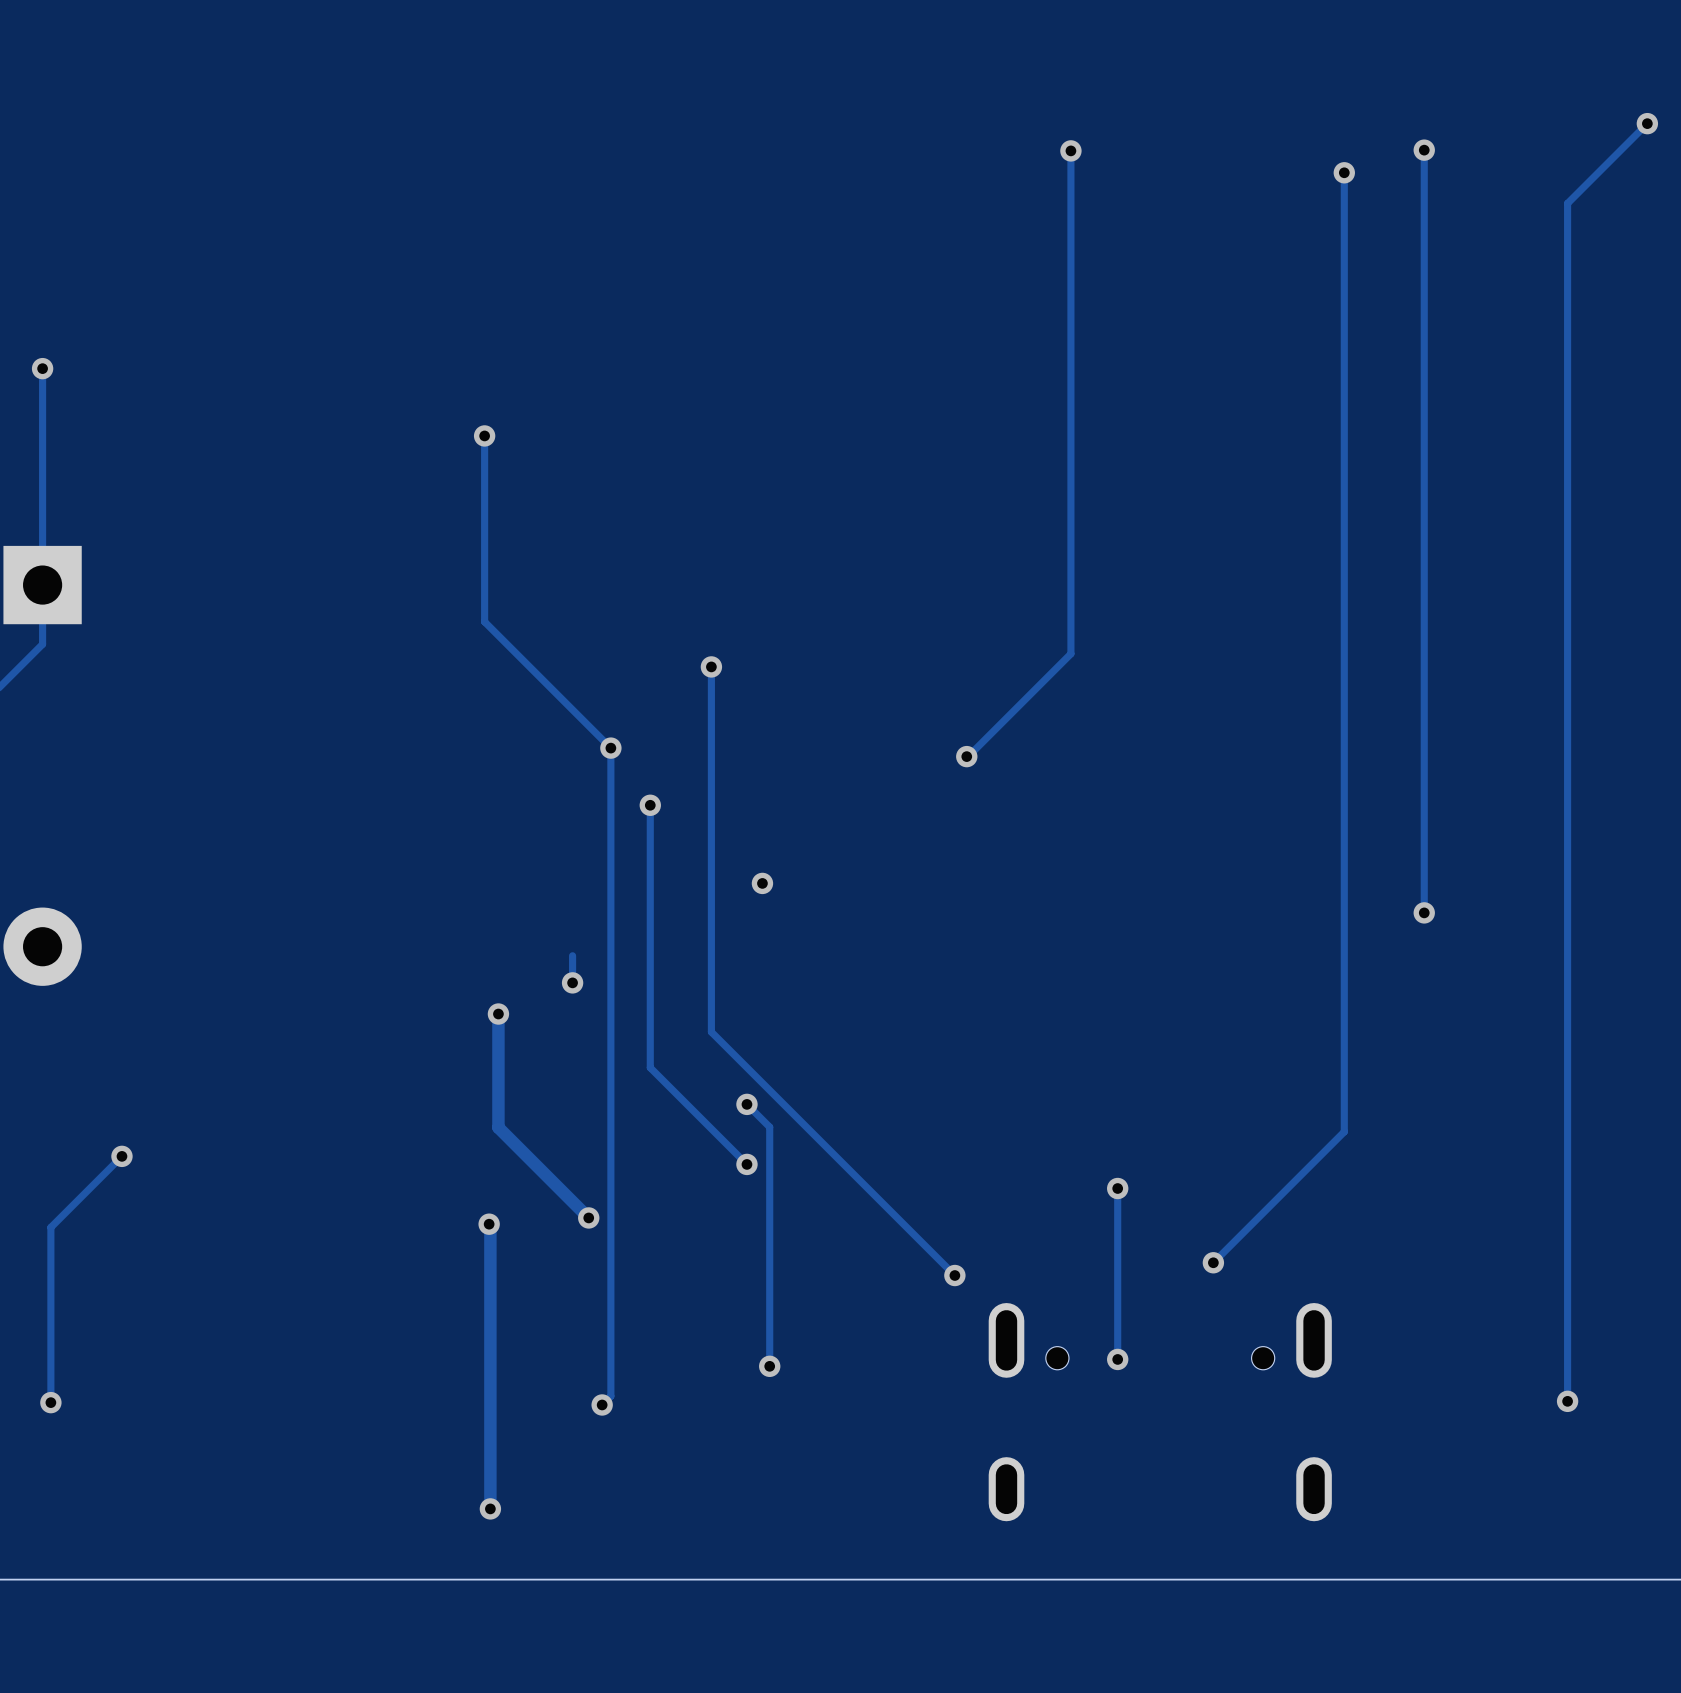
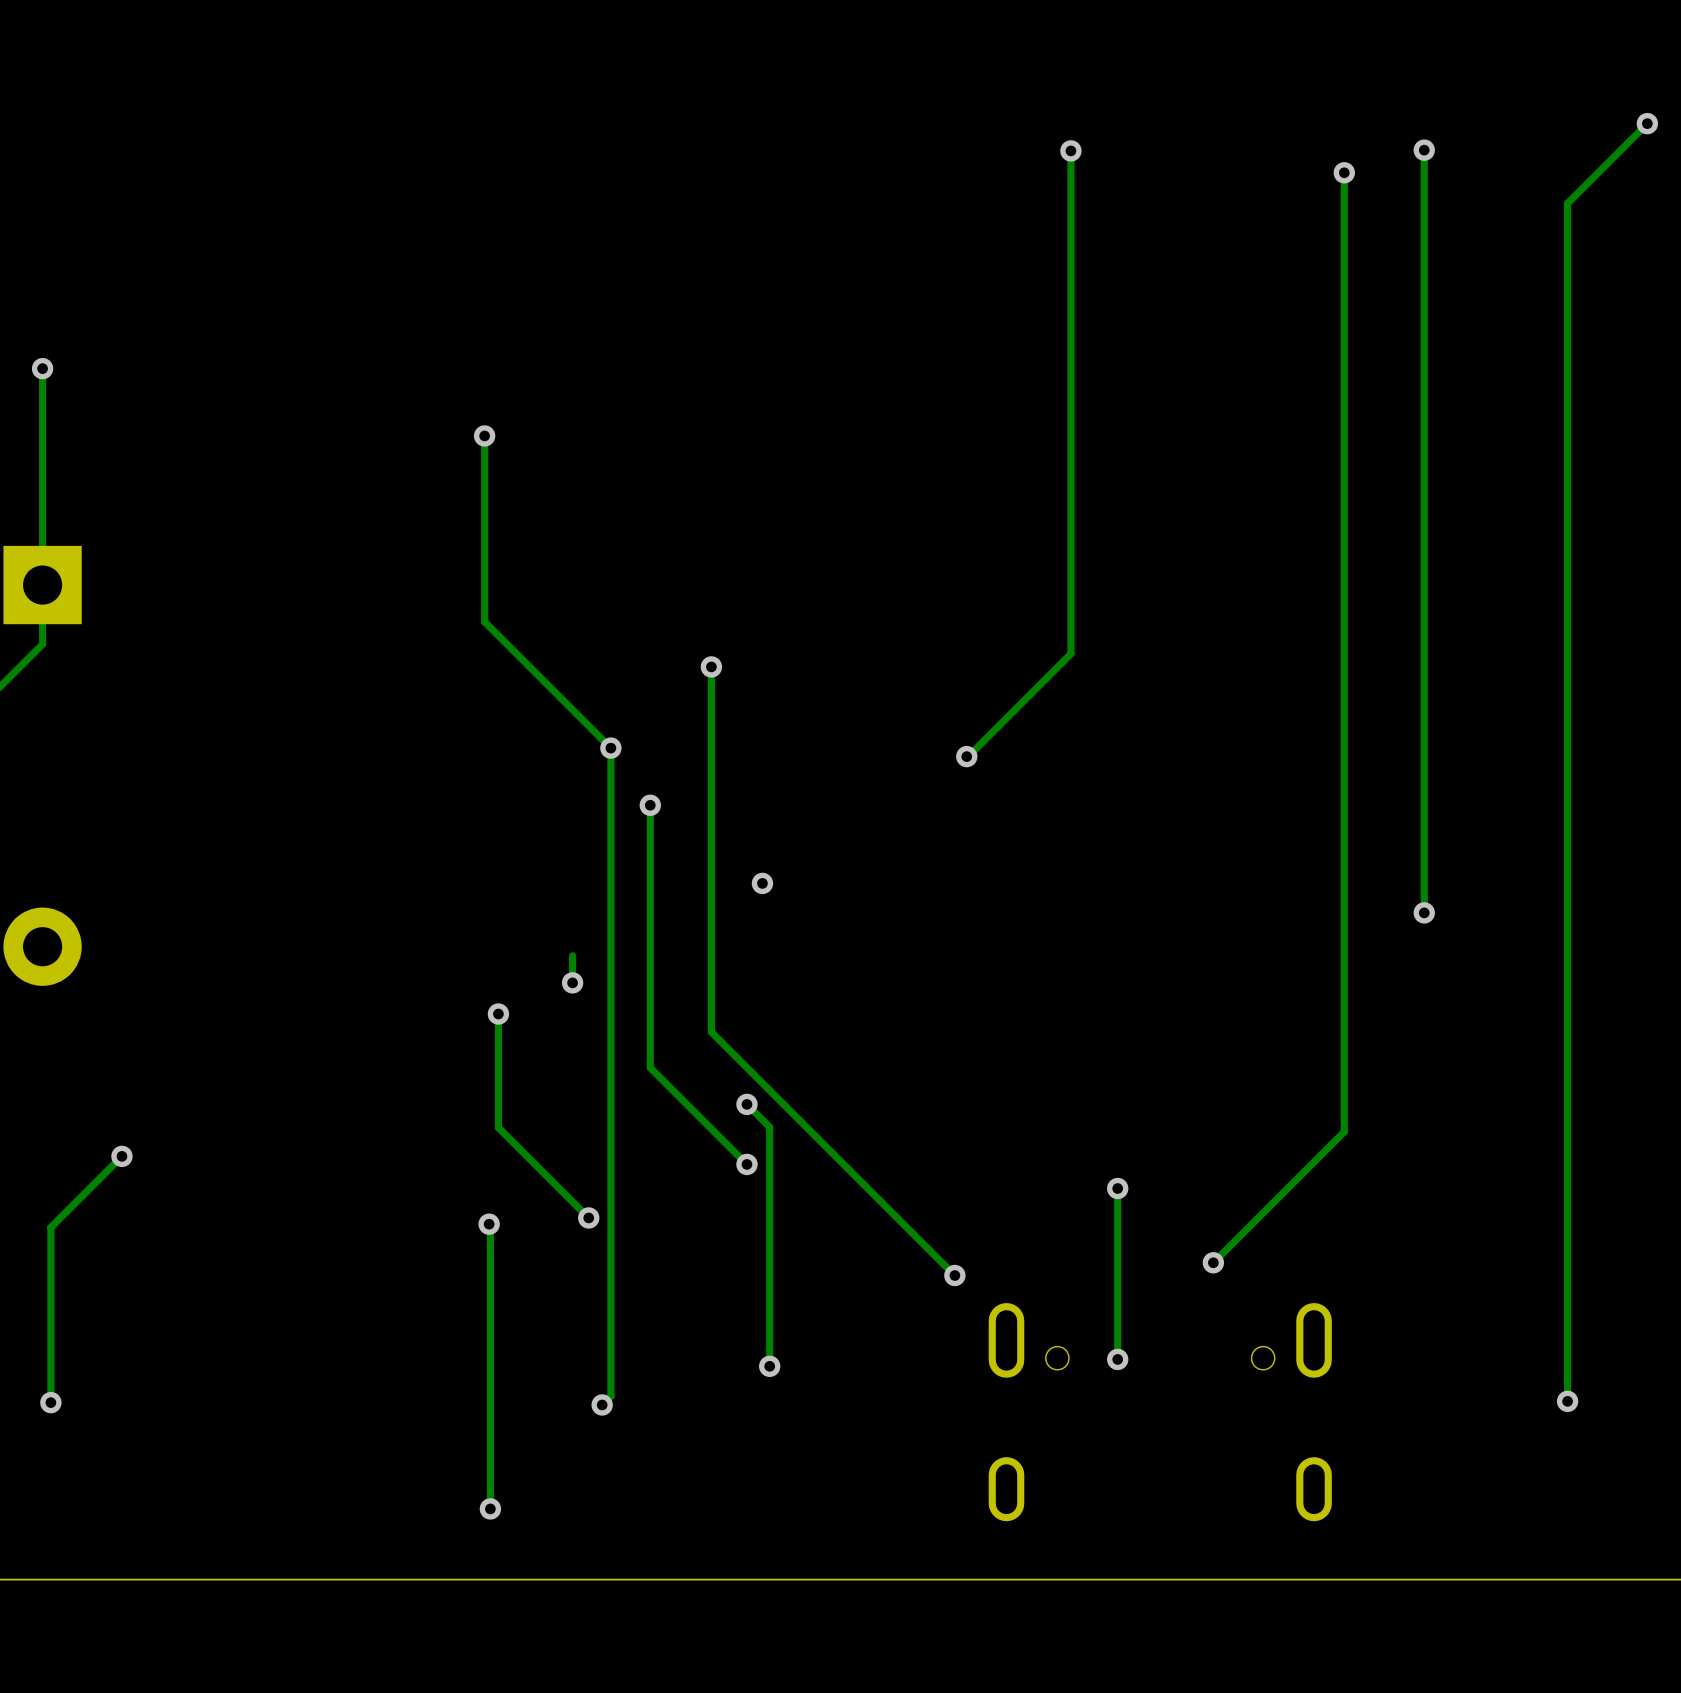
track width: thick (498, 1014) (498, 1127) (588, 1217) -> thin (498, 1014) (498, 1127) (588, 1217)
track width: thick (489, 1224) (490, 1508) -> thin (489, 1224) (490, 1508)

